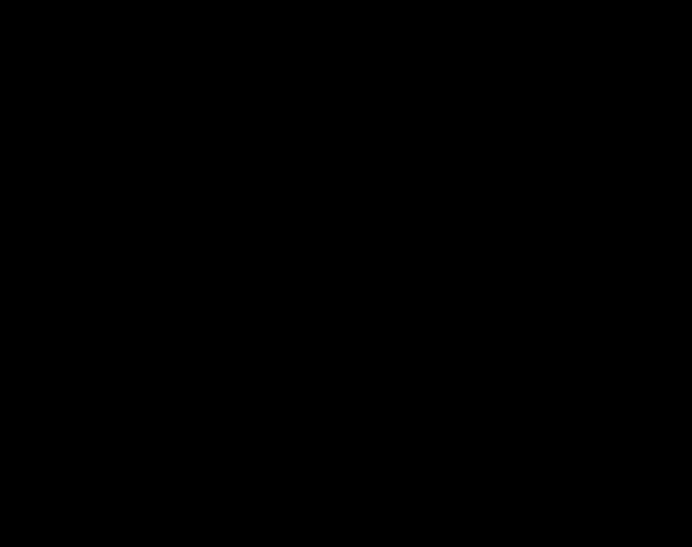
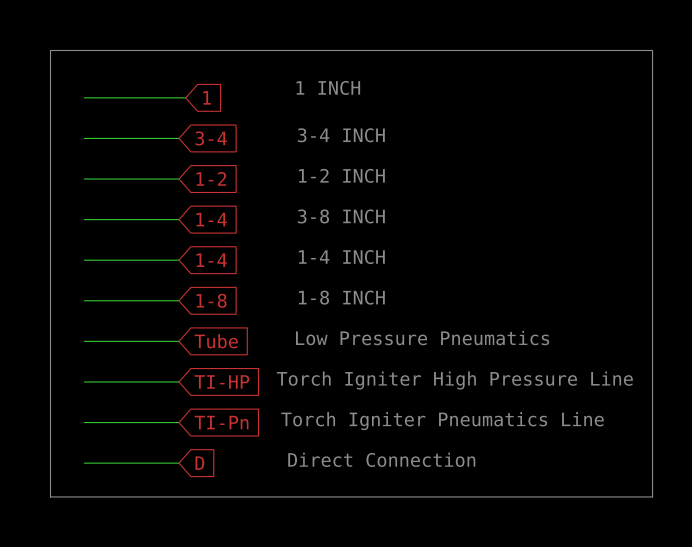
line: none -> (50, 50) (652, 50) (652, 496) (50, 496) (50, 50)
text: none -> 1 INCH (328, 87)
wire: none -> (84, 97) (185, 97)
global label: none -> 1 (207, 97)
text: none -> 3-4 INCH (341, 135)
wire: none -> (84, 138) (179, 138)
global label: none -> 3-4 (211, 138)
text: none -> 1-2 INCH (341, 175)
global label: none -> 1-2 (211, 178)
wire: none -> (84, 179) (179, 179)
text: none -> 3-8 INCH (341, 216)
wire: none -> (84, 219) (179, 219)
global label: none -> 1-4 (211, 219)
text: none -> 1-4 INCH (341, 257)
wire: none -> (84, 260) (179, 260)
global label: none -> 1-4 (211, 260)
text: none -> 1-8 INCH (341, 297)
wire: none -> (84, 300) (179, 300)
global label: none -> 1-8 (211, 300)
text: none -> Low Pressure Pneumatics (422, 338)
wire: none -> (84, 341) (179, 341)
global label: none -> Tube (216, 341)
text: none -> Torch Igniter High Pressure Line (454, 380)
wire: none -> (84, 381) (179, 381)
global label: none -> TI-HP (221, 381)
text: none -> Torch Igniter Pneumatics Line (442, 421)
wire: none -> (84, 422) (179, 422)
global label: none -> TI-Pn (221, 422)
text: none -> Direct Connection (381, 459)
wire: none -> (84, 463) (179, 463)
global label: none -> D (199, 463)

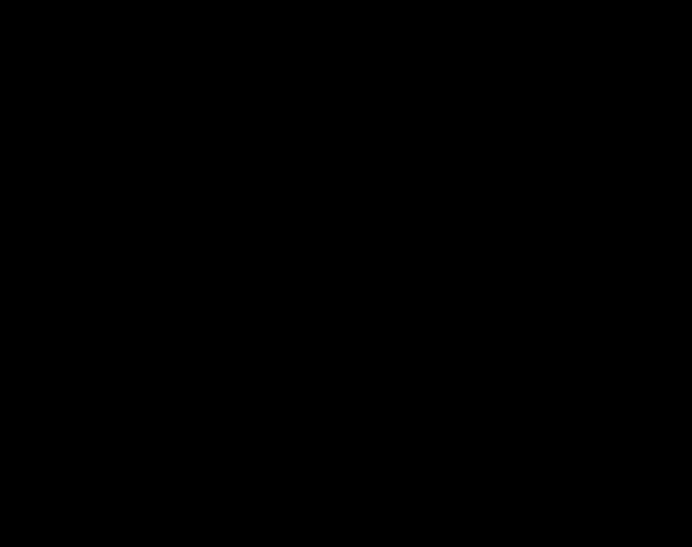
line: (50, 50) (652, 50) (652, 496) (50, 496) (50, 50) -> none
text: 1 INCH (328, 87) -> none
wire: (84, 97) (185, 97) -> none
global label: 1 (207, 97) -> none
text: 3-4 INCH (341, 135) -> none
wire: (84, 138) (179, 138) -> none
global label: 3-4 (211, 138) -> none
text: 1-2 INCH (341, 175) -> none
global label: 1-2 (211, 178) -> none
wire: (84, 179) (179, 179) -> none
text: 3-8 INCH (341, 216) -> none
wire: (84, 219) (179, 219) -> none
global label: 1-4 (211, 219) -> none
text: 1-4 INCH (341, 257) -> none
wire: (84, 260) (179, 260) -> none
global label: 1-4 (211, 260) -> none
text: 1-8 INCH (341, 297) -> none
wire: (84, 300) (179, 300) -> none
global label: 1-8 (211, 300) -> none
text: Low Pressure Pneumatics (422, 338) -> none
wire: (84, 341) (179, 341) -> none
global label: Tube (216, 341) -> none
text: Torch Igniter High Pressure Line (454, 380) -> none
wire: (84, 381) (179, 381) -> none
global label: TI-HP (221, 381) -> none
text: Torch Igniter Pneumatics Line (442, 421) -> none
wire: (84, 422) (179, 422) -> none
global label: TI-Pn (221, 422) -> none
text: Direct Connection (381, 459) -> none
wire: (84, 463) (179, 463) -> none
global label: D (199, 463) -> none

